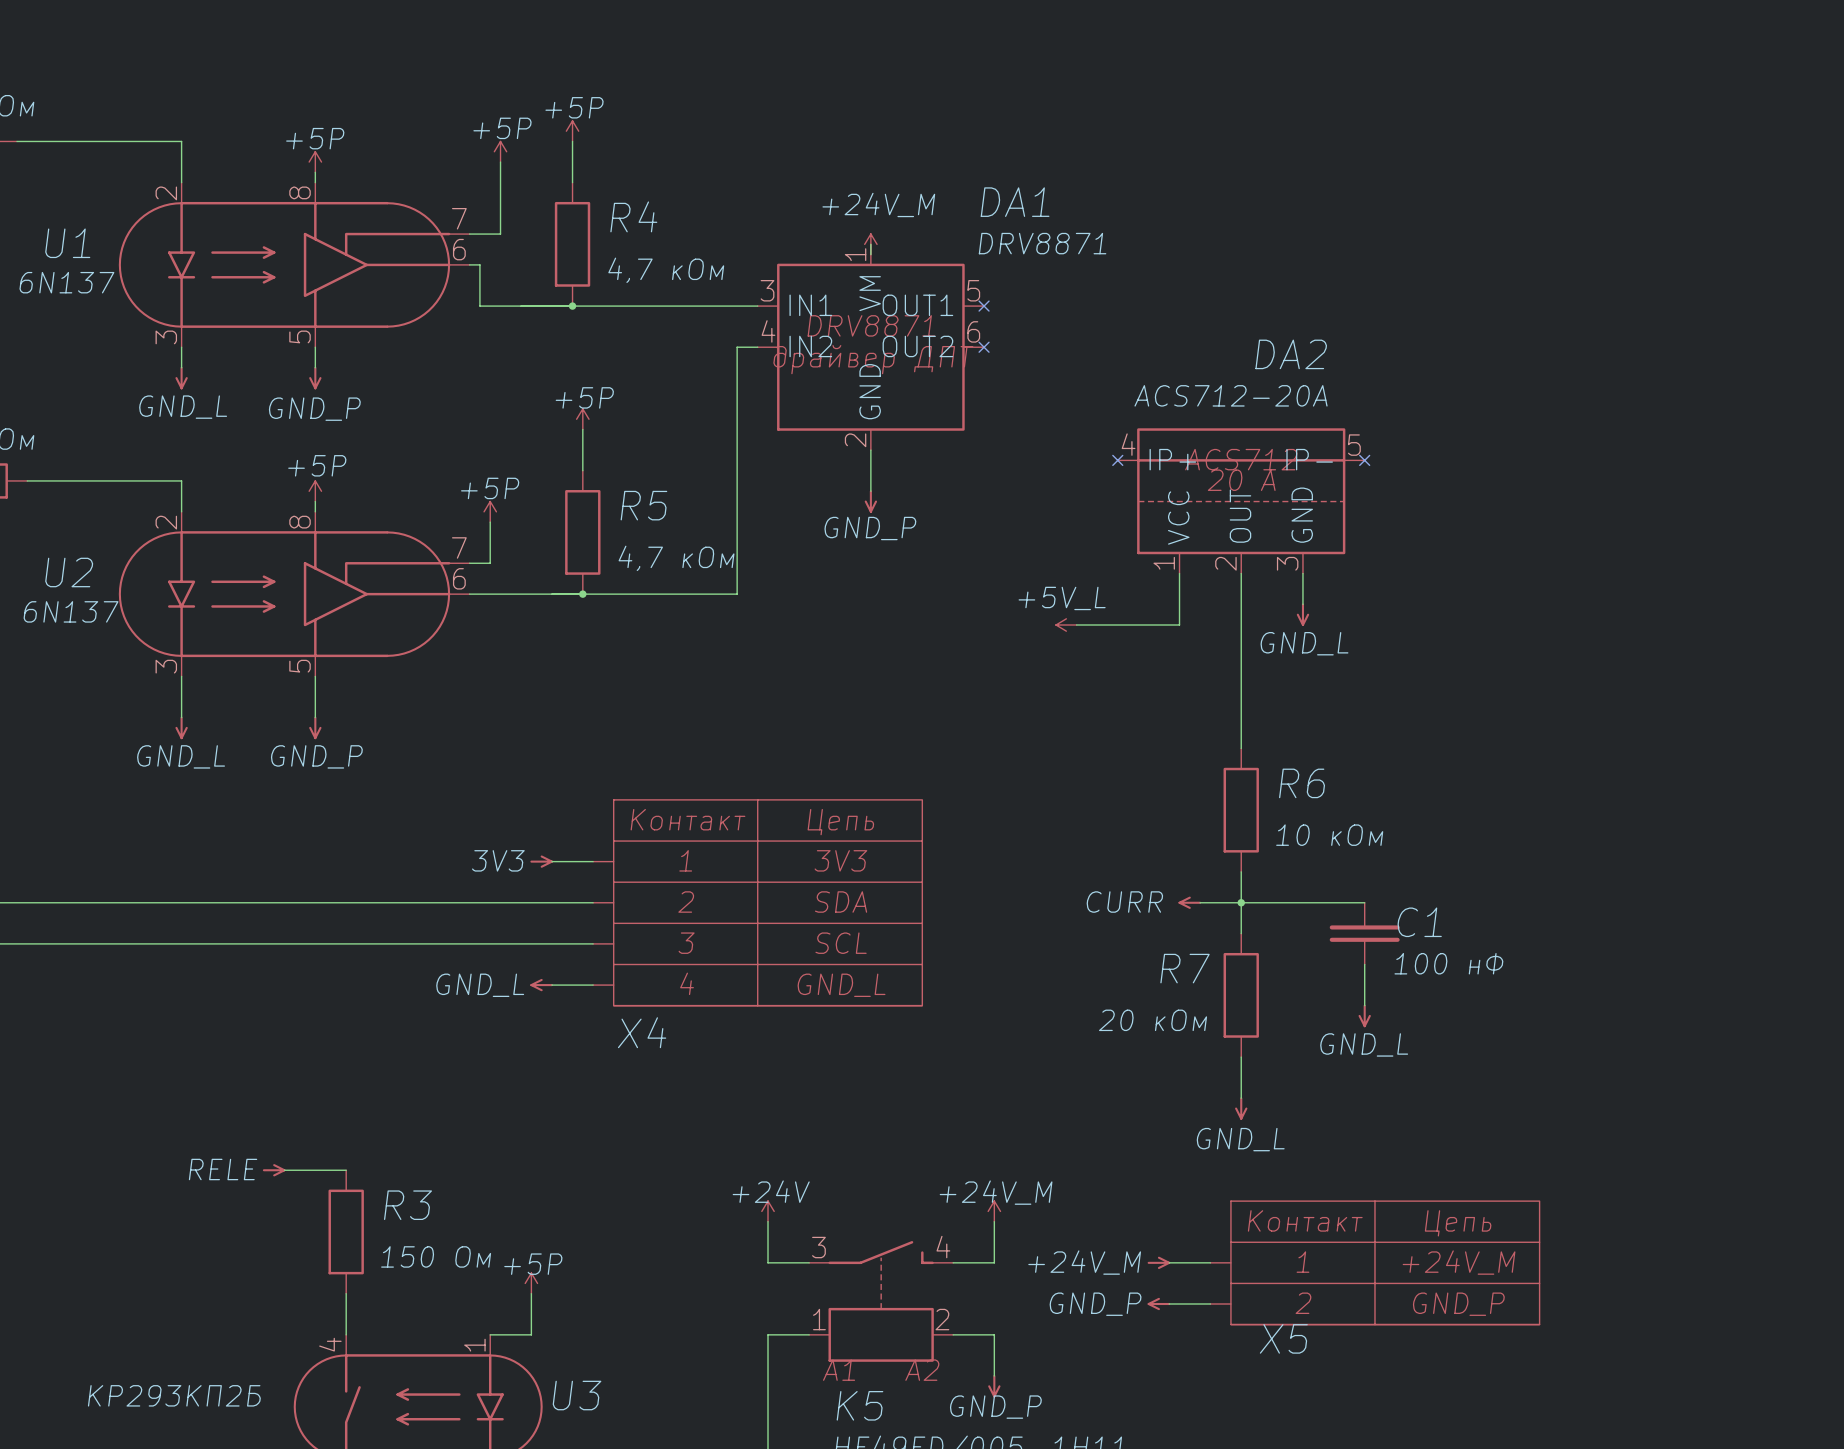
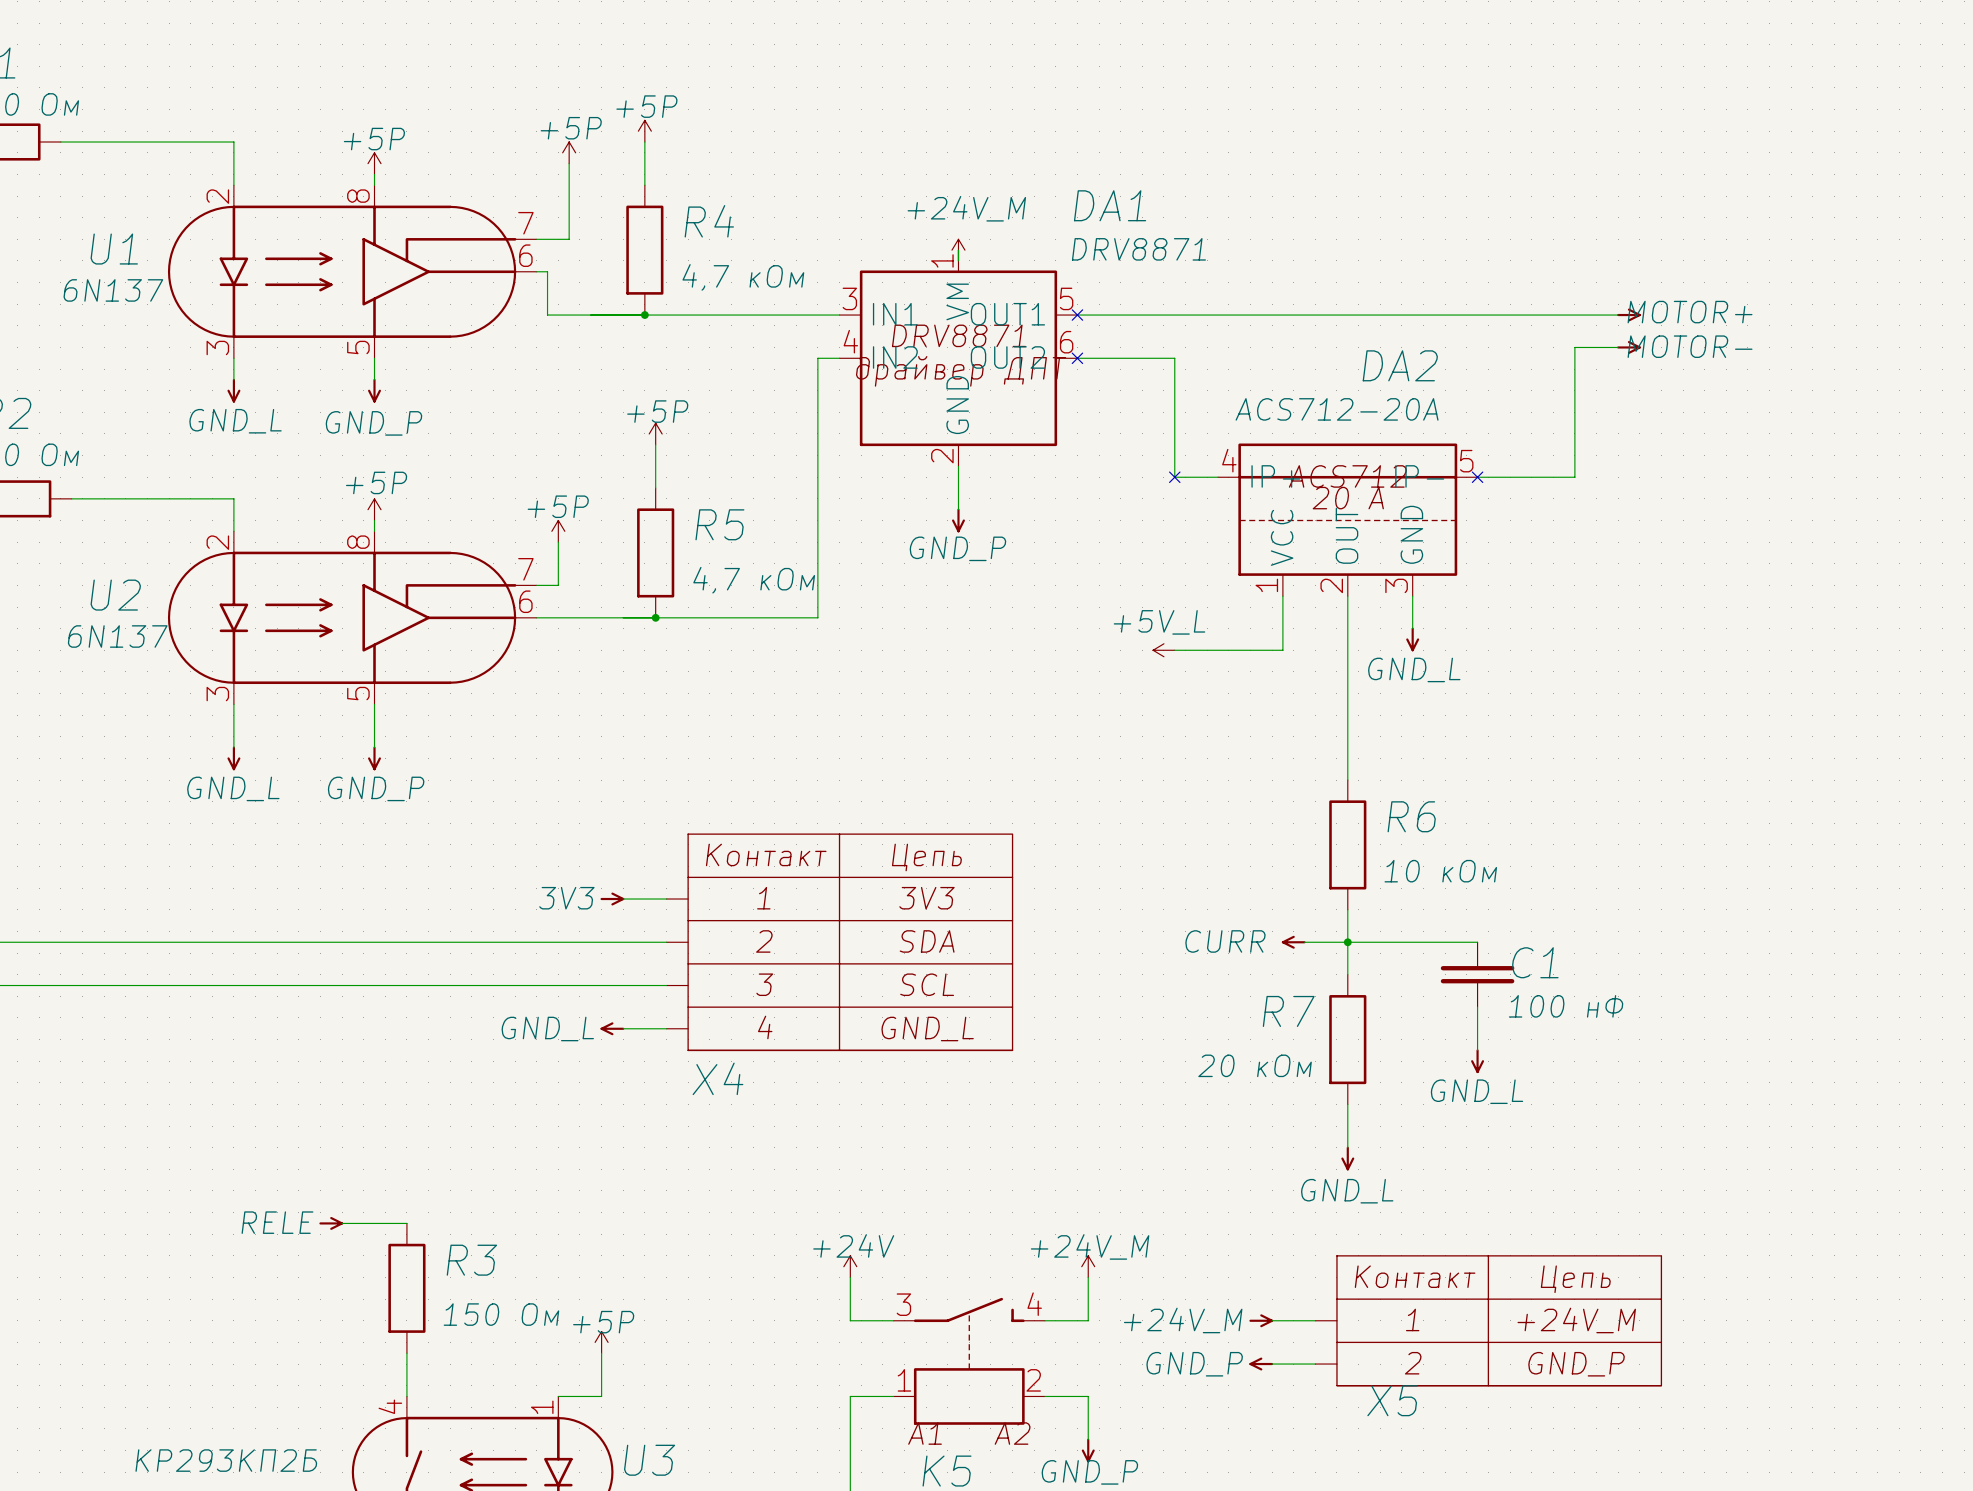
wire: none -> (1077, 315) (1618, 315)
power symbol: none -> MOTOR+ (1628, 315)
wire: none -> (1618, 347) (1574, 347) (1574, 477) (1477, 477)
power symbol: none -> MOTOR- (1628, 347)
wire: none -> (1077, 358) (1174, 358) (1174, 477) (1218, 477)
no-connect mark position: (1117, 460) -> (1174, 477)

